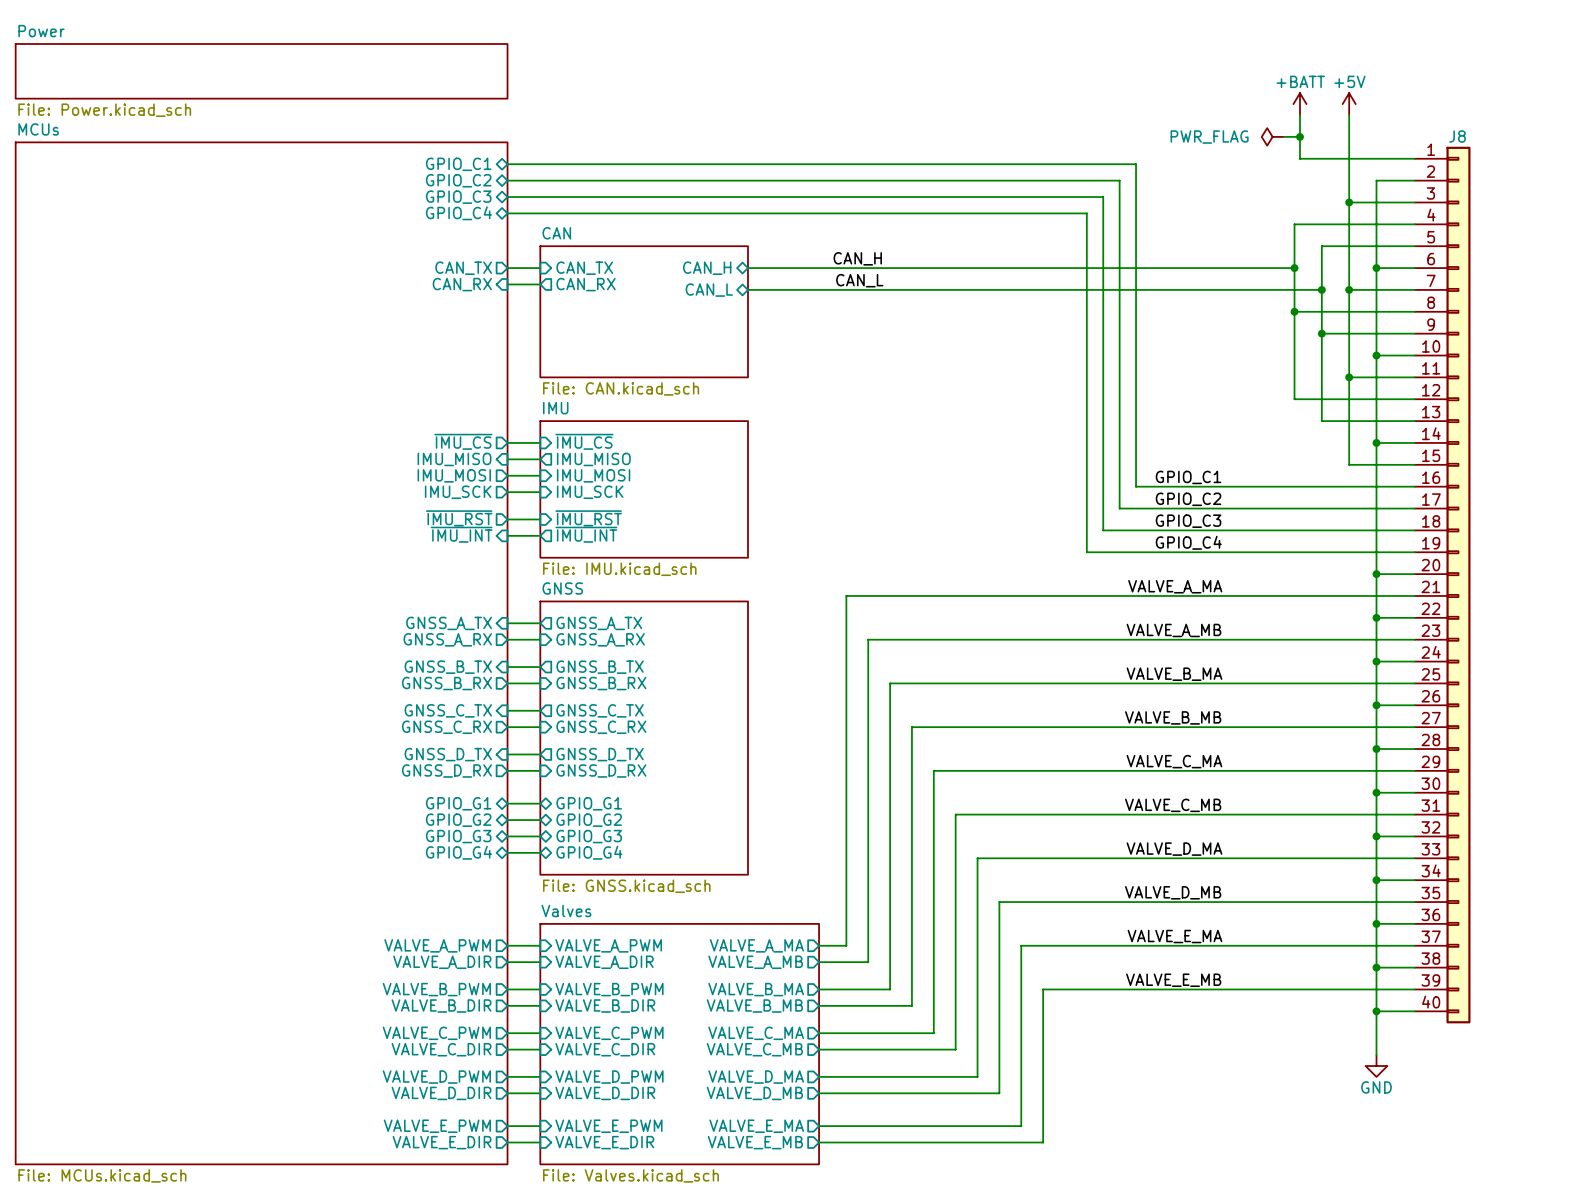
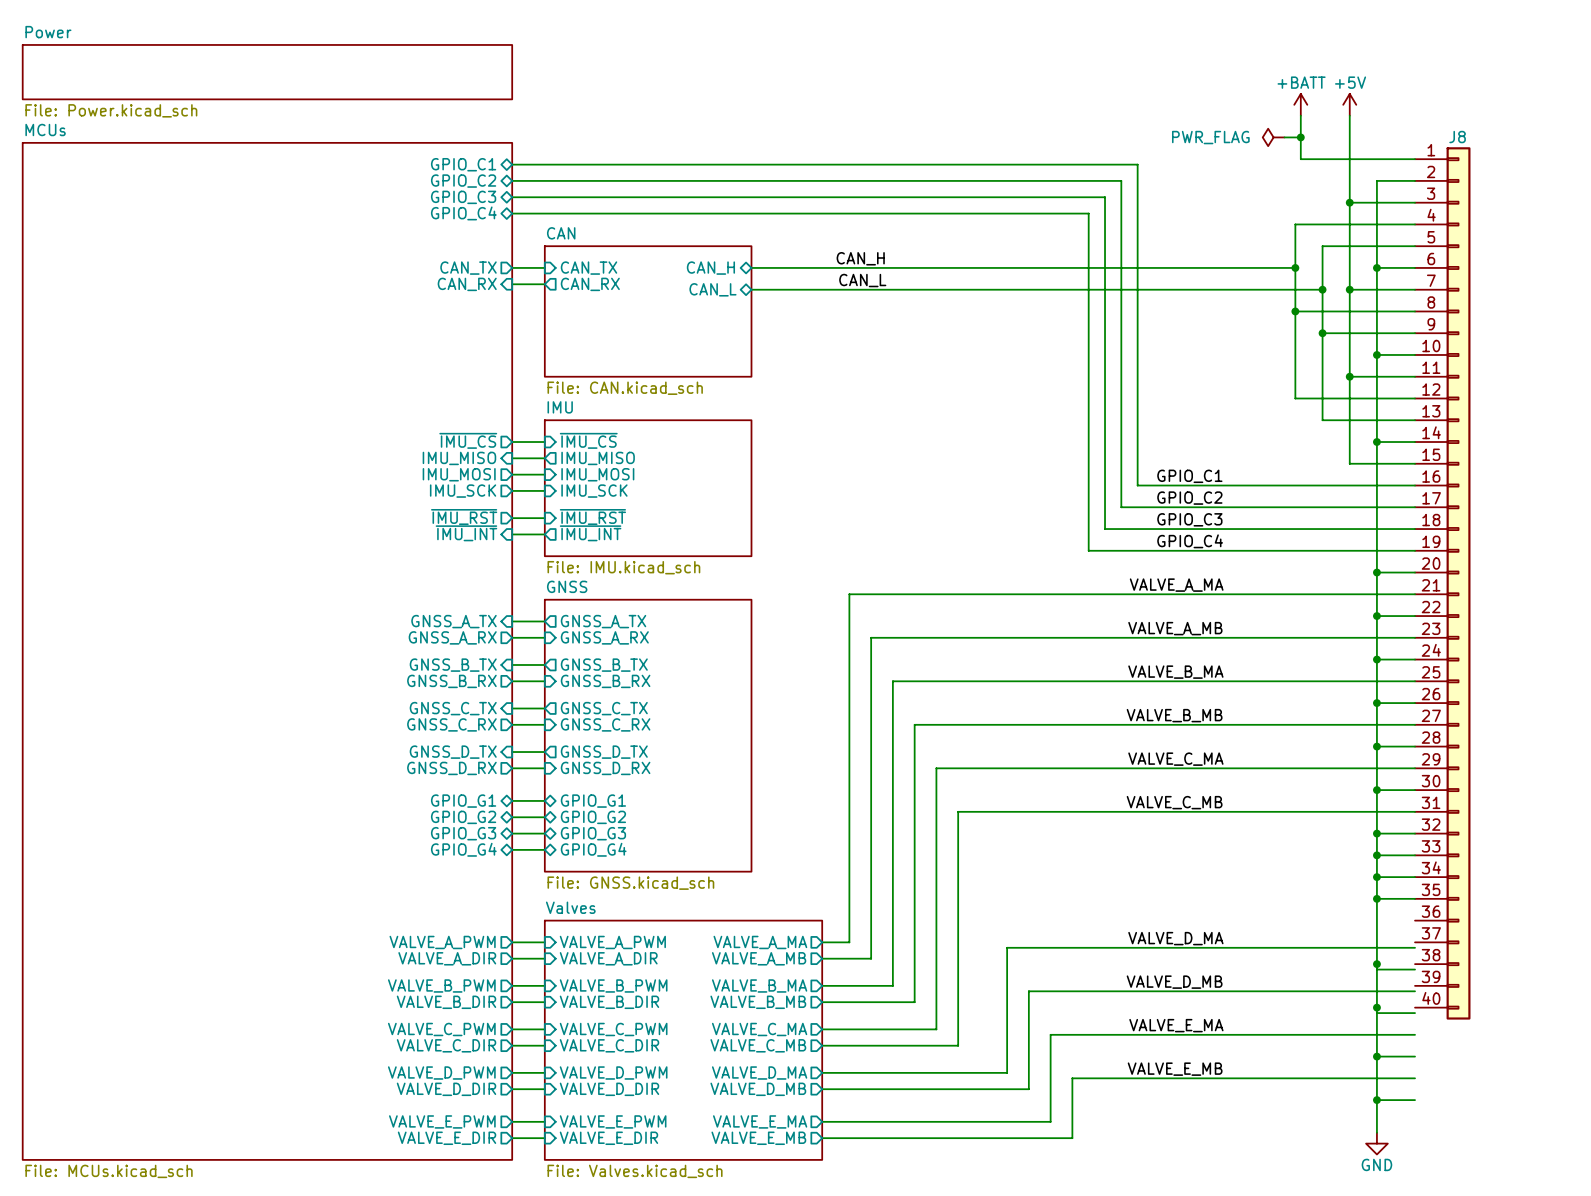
label position: VALVE_D_MA (1174, 849) -> VALVE_D_MA (1175, 938)
wire: (1376, 858) (977, 858) (977, 1076) -> (1415, 947) (1007, 947) (1007, 1072) (979, 1072)
junction: none -> (1376, 855)
label position: VALVE_D_MB (1173, 892) -> VALVE_D_MB (1174, 982)
wire: (1376, 902) (999, 902) (999, 1093) -> (1415, 991) (1028, 991) (1028, 1089) (1001, 1089)
wire: (1376, 923) (1414, 923) -> (1376, 969) (1415, 969)
junction position: (1376, 923) -> (1376, 898)
label position: VALVE_E_MA (1174, 936) -> VALVE_E_MA (1176, 1025)
wire: (1414, 945) (1021, 945) (1021, 1126) -> (1415, 1034) (1050, 1034) (1050, 1121) (1023, 1121)
wire: (1376, 967) (1414, 967) -> (1376, 1013) (1415, 1013)
label position: VALVE_E_MB (1173, 980) -> VALVE_E_MB (1175, 1069)
wire: (1414, 989) (1043, 989) (1043, 1142) -> (1415, 1078) (1072, 1078) (1072, 1138) (1045, 1138)
wire: (1376, 1011) (1414, 1011) -> (1376, 1056) (1415, 1056)
wire: none -> (1376, 1051) (1376, 1132)
junction: none -> (1376, 1056)
power symbol position: GND (1376, 1065) -> GND (1376, 1143)
wire: none -> (1376, 1100) (1415, 1100)
junction: none -> (1376, 1100)

